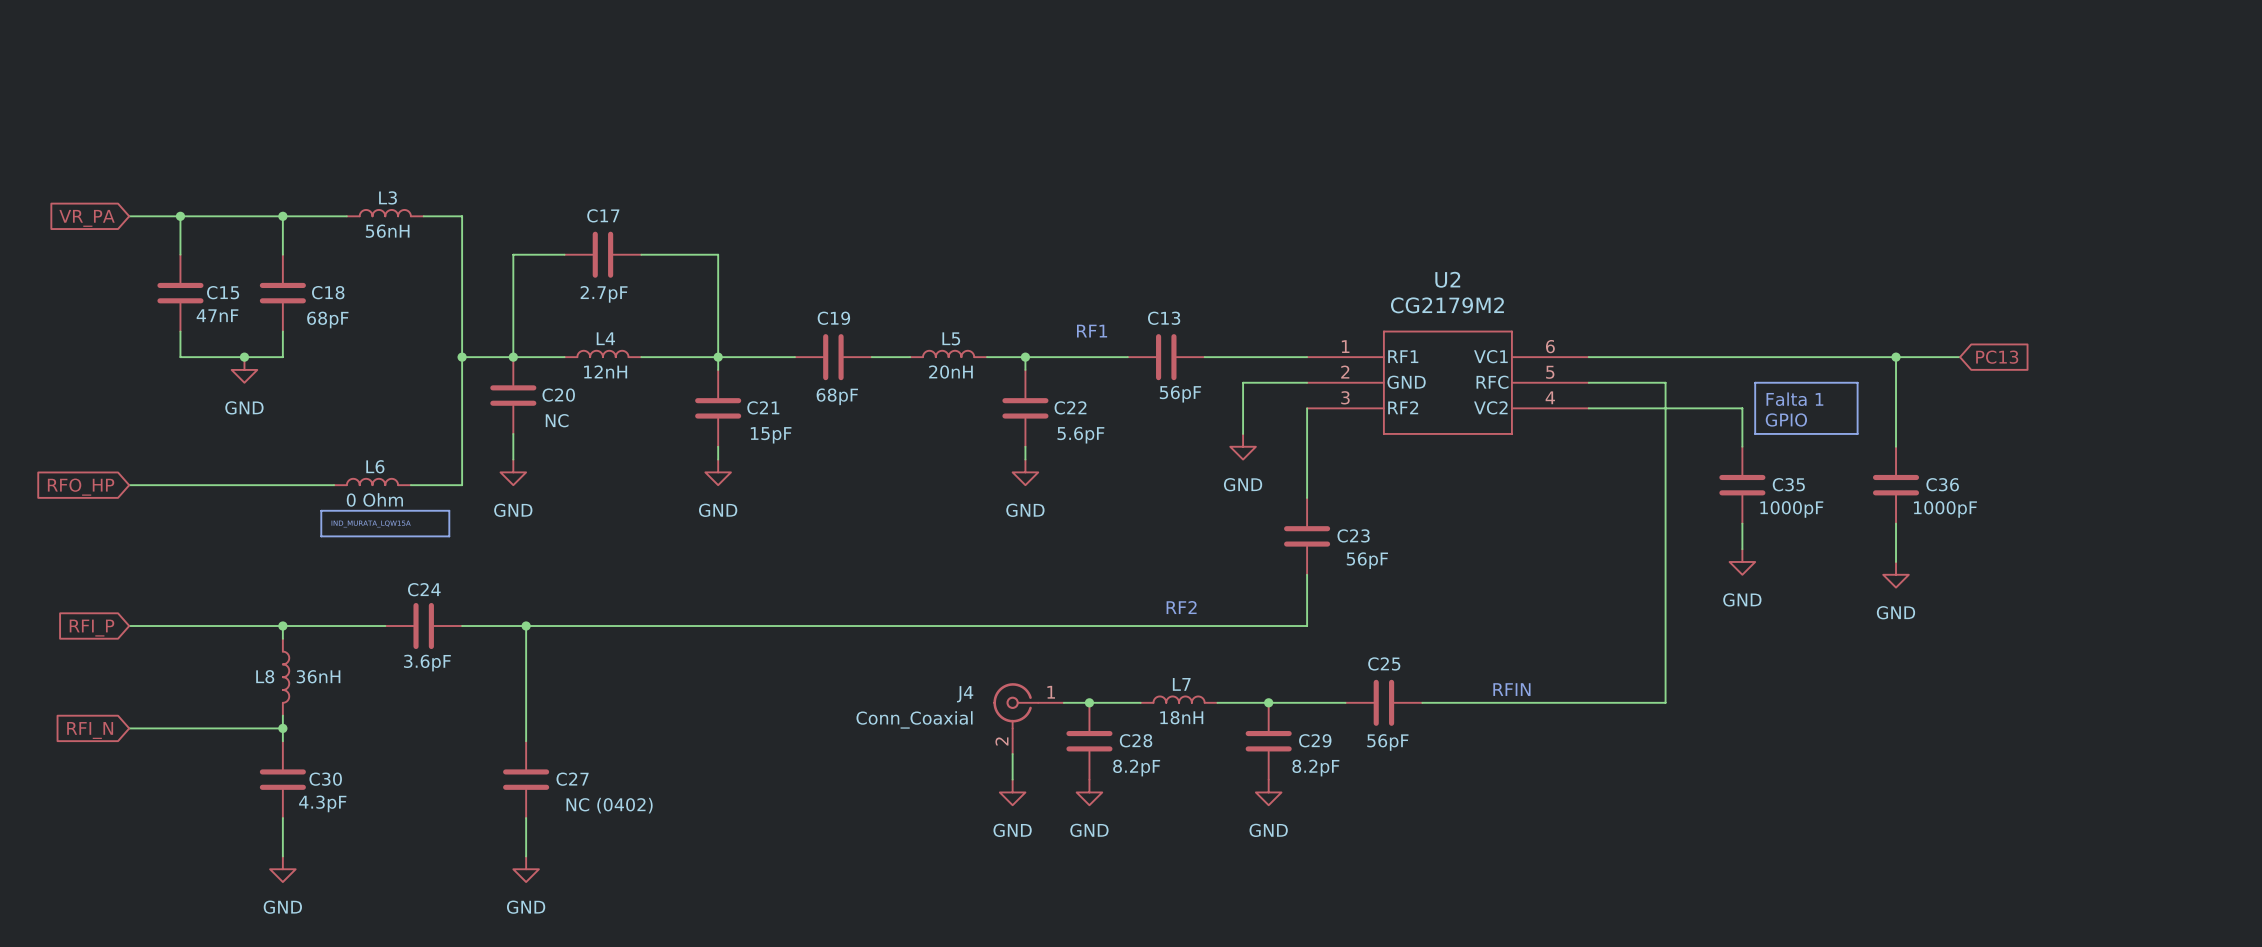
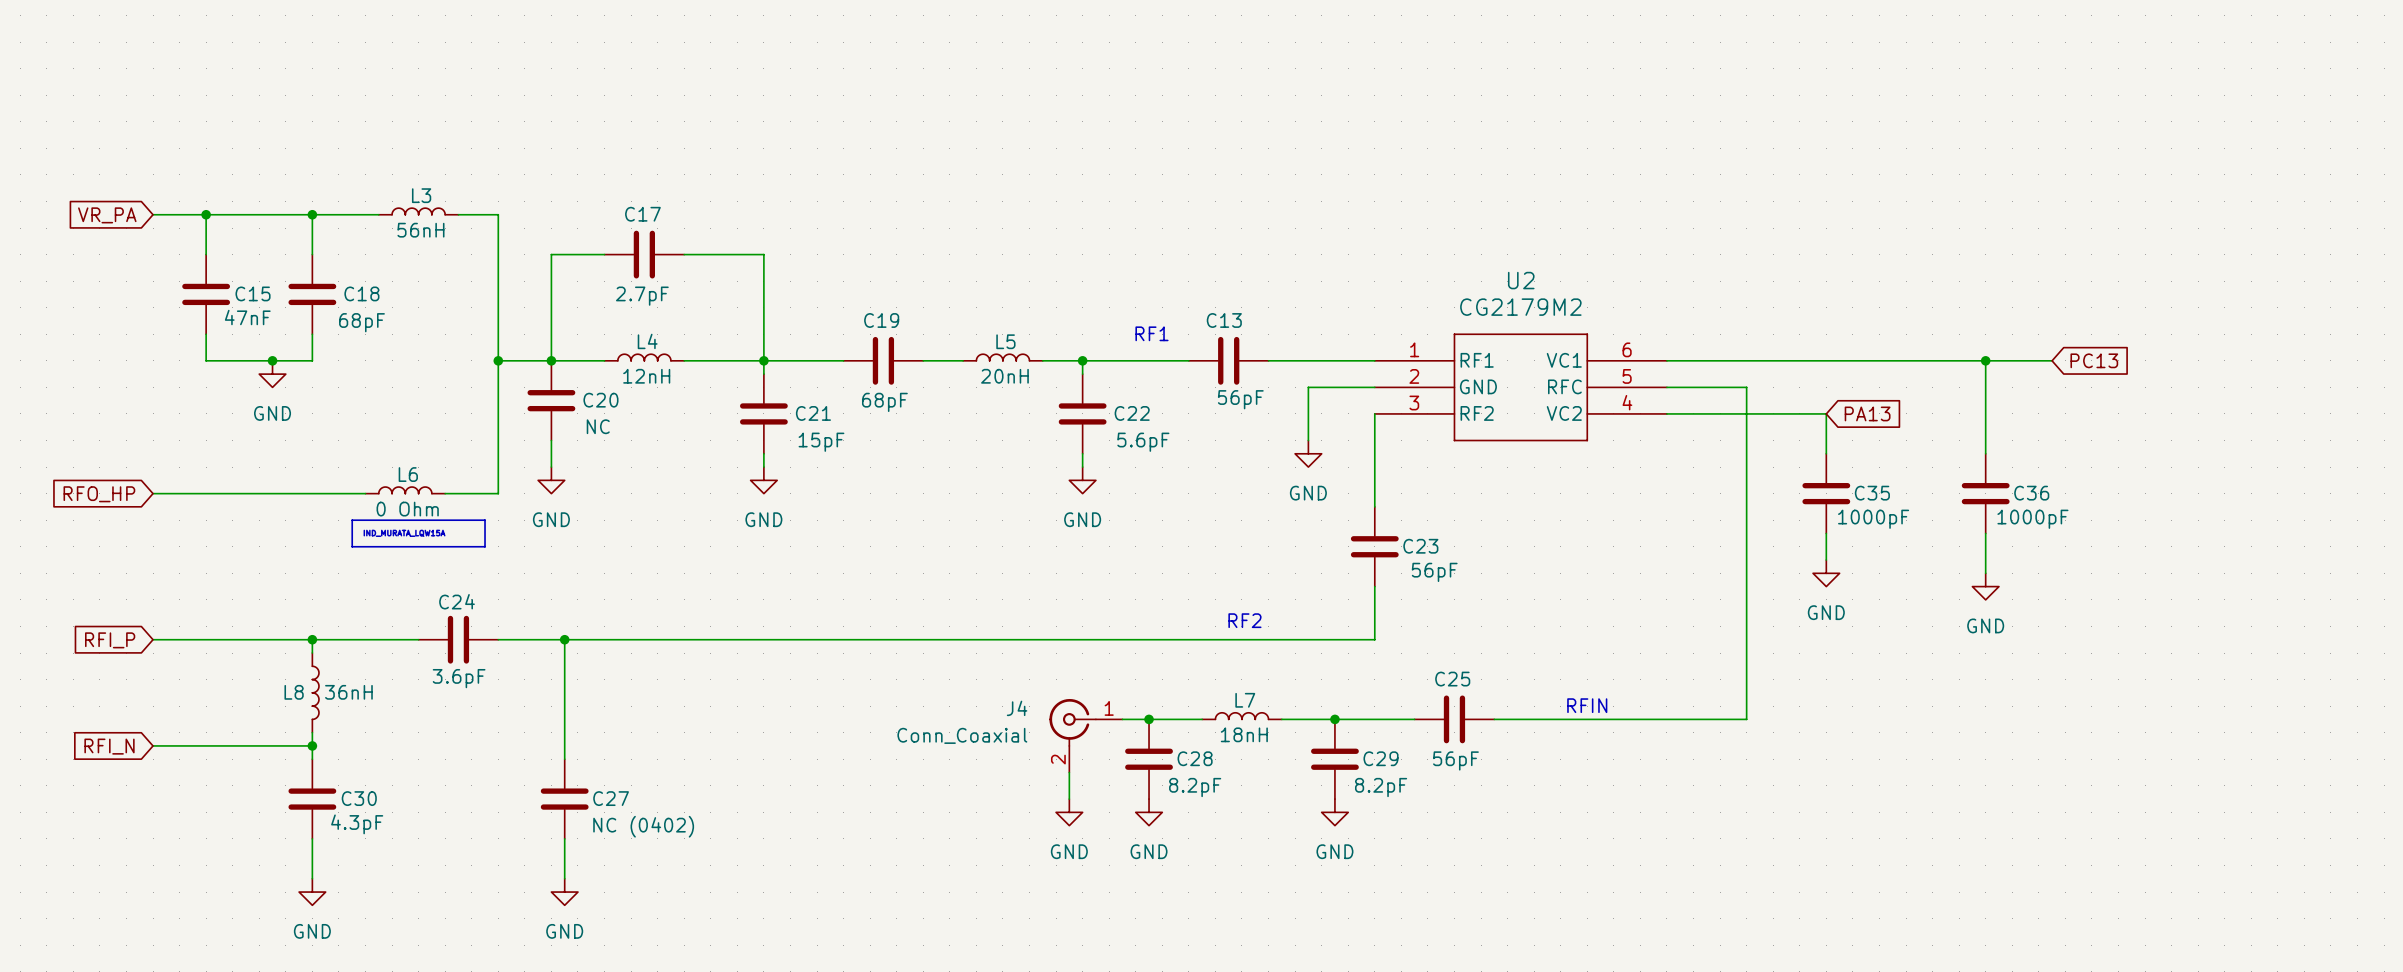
line: (1755, 382) (1857, 382) (1857, 433) (1755, 433) (1755, 382) -> none
text: Falta 1 (1794, 399) -> none
global label: none -> PA13 (1867, 413)
text: GPIO (1786, 419) -> none

